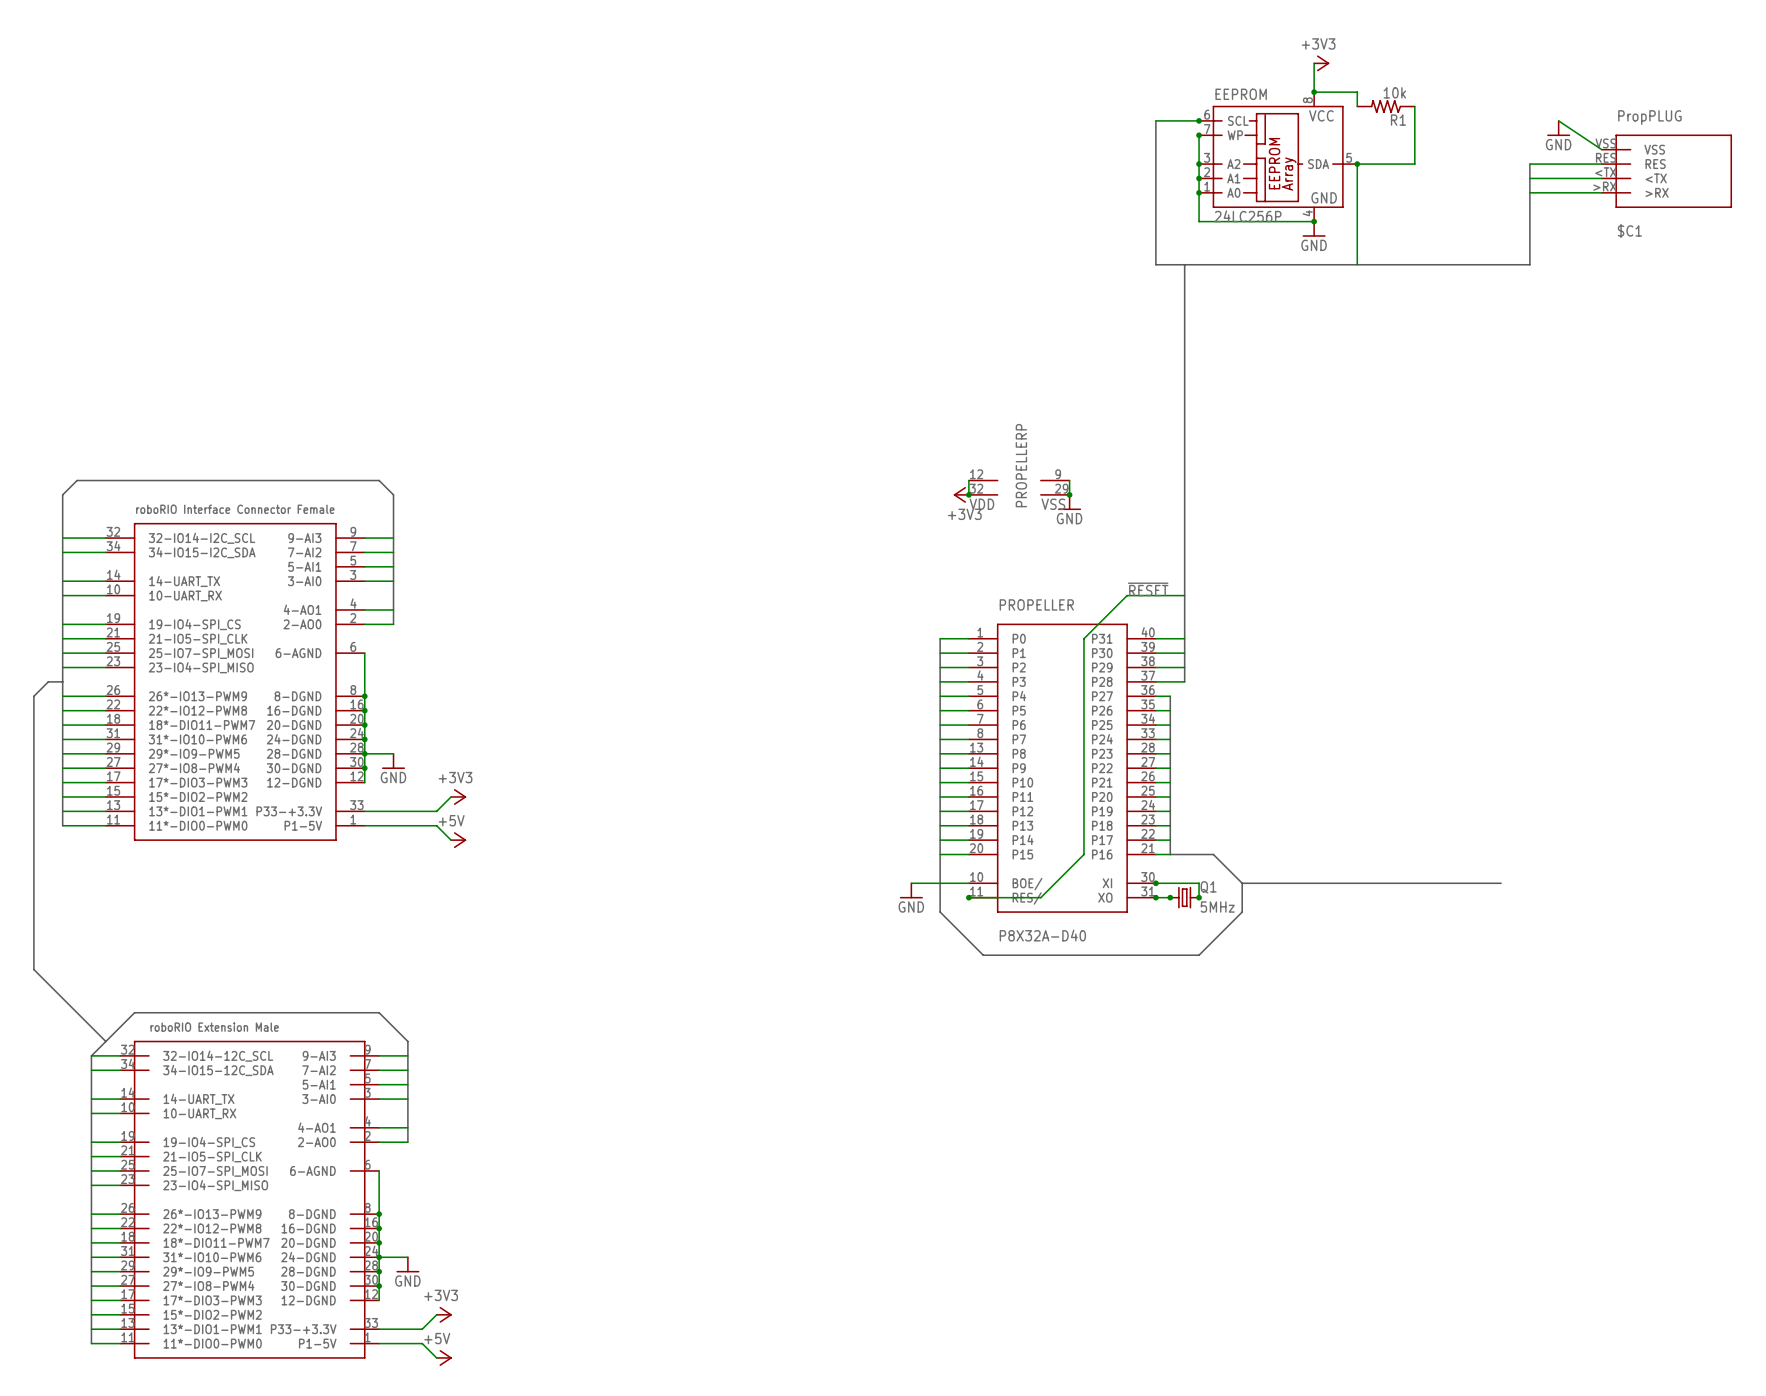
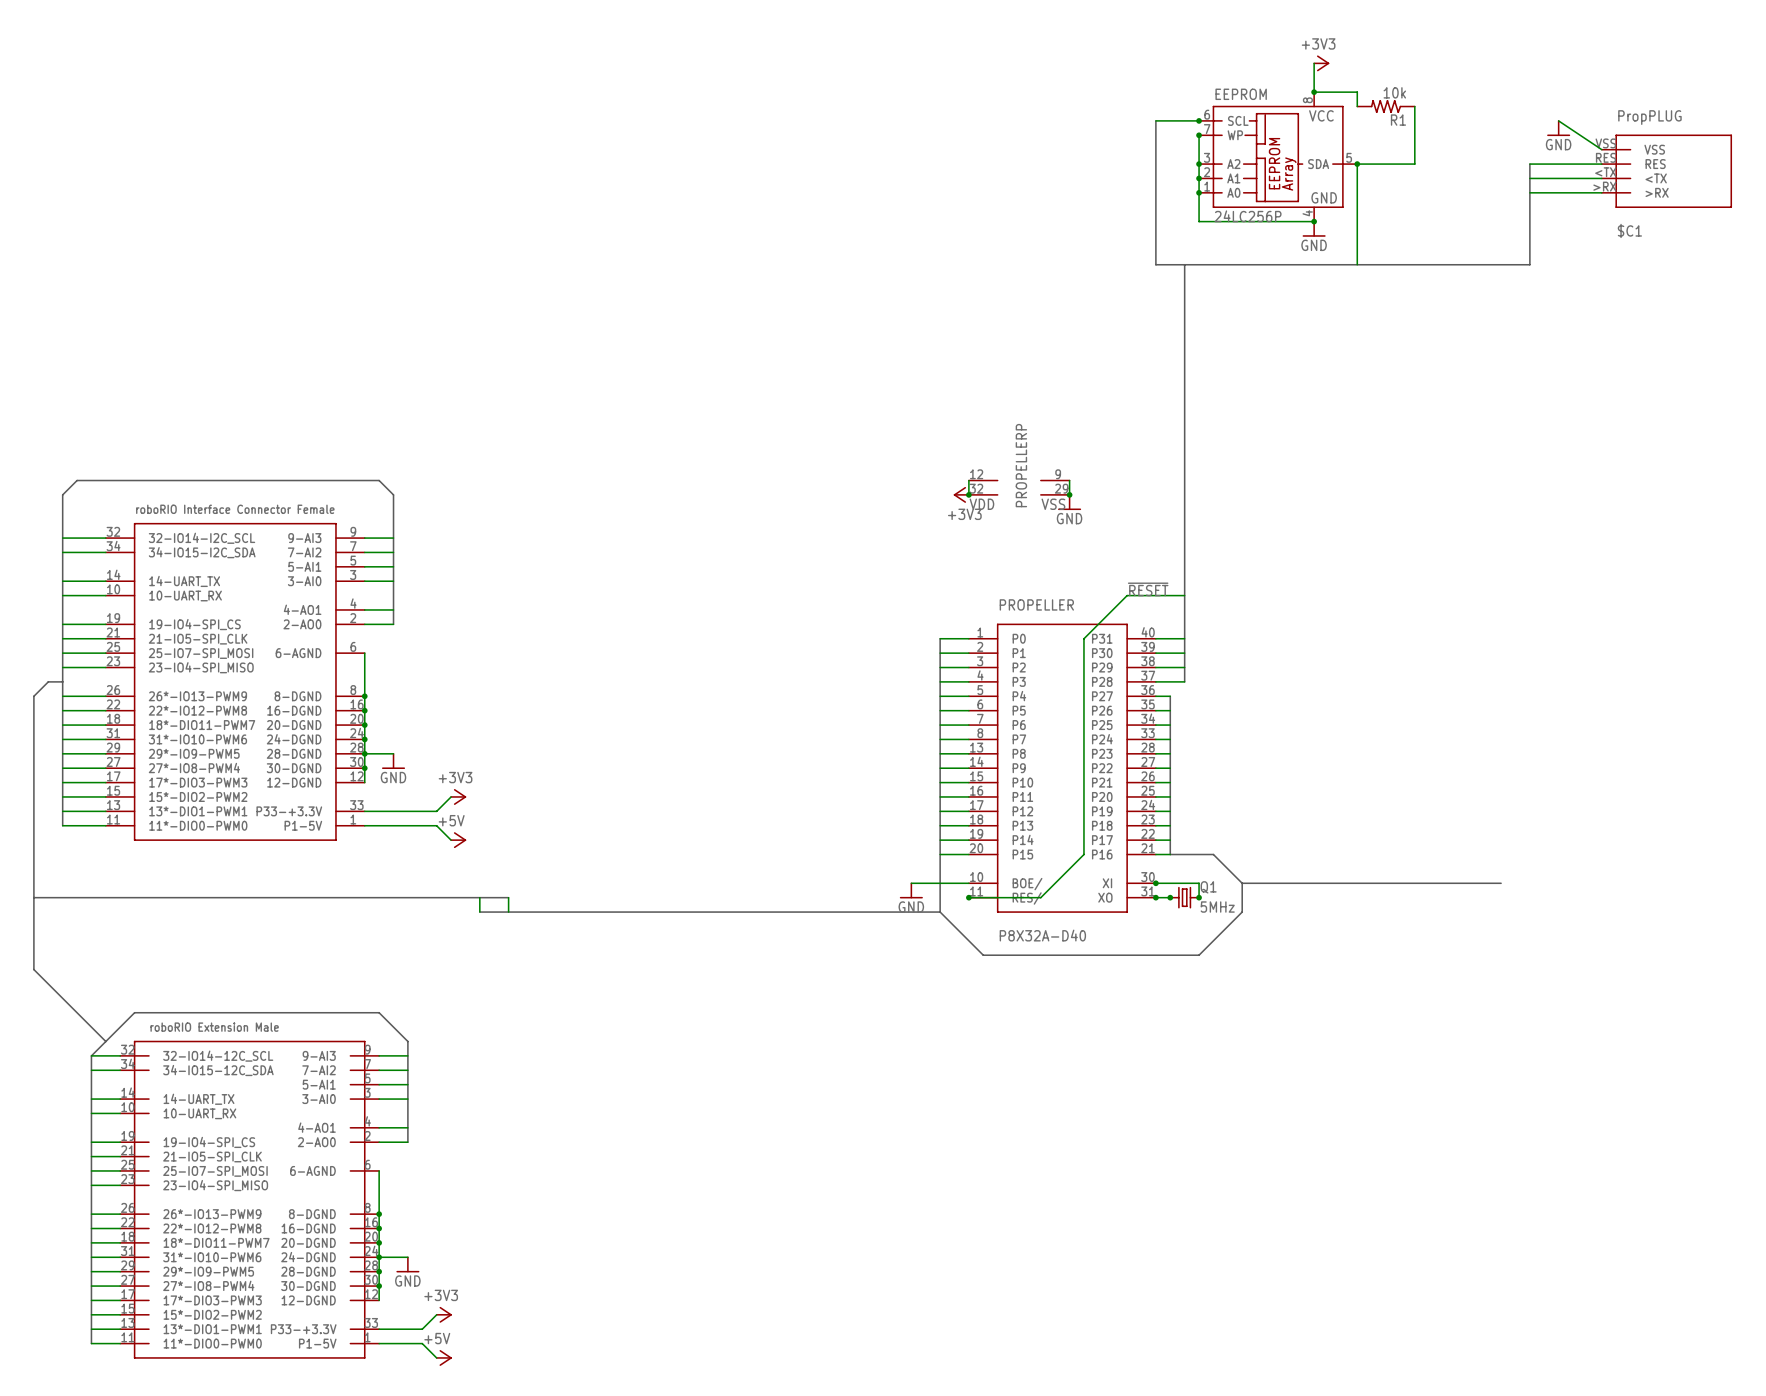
bus: none -> (33, 897) (508, 897)
wire: none -> (479, 897) (479, 912)
wire: none -> (508, 897) (508, 912)
bus: none -> (479, 912) (940, 912)

